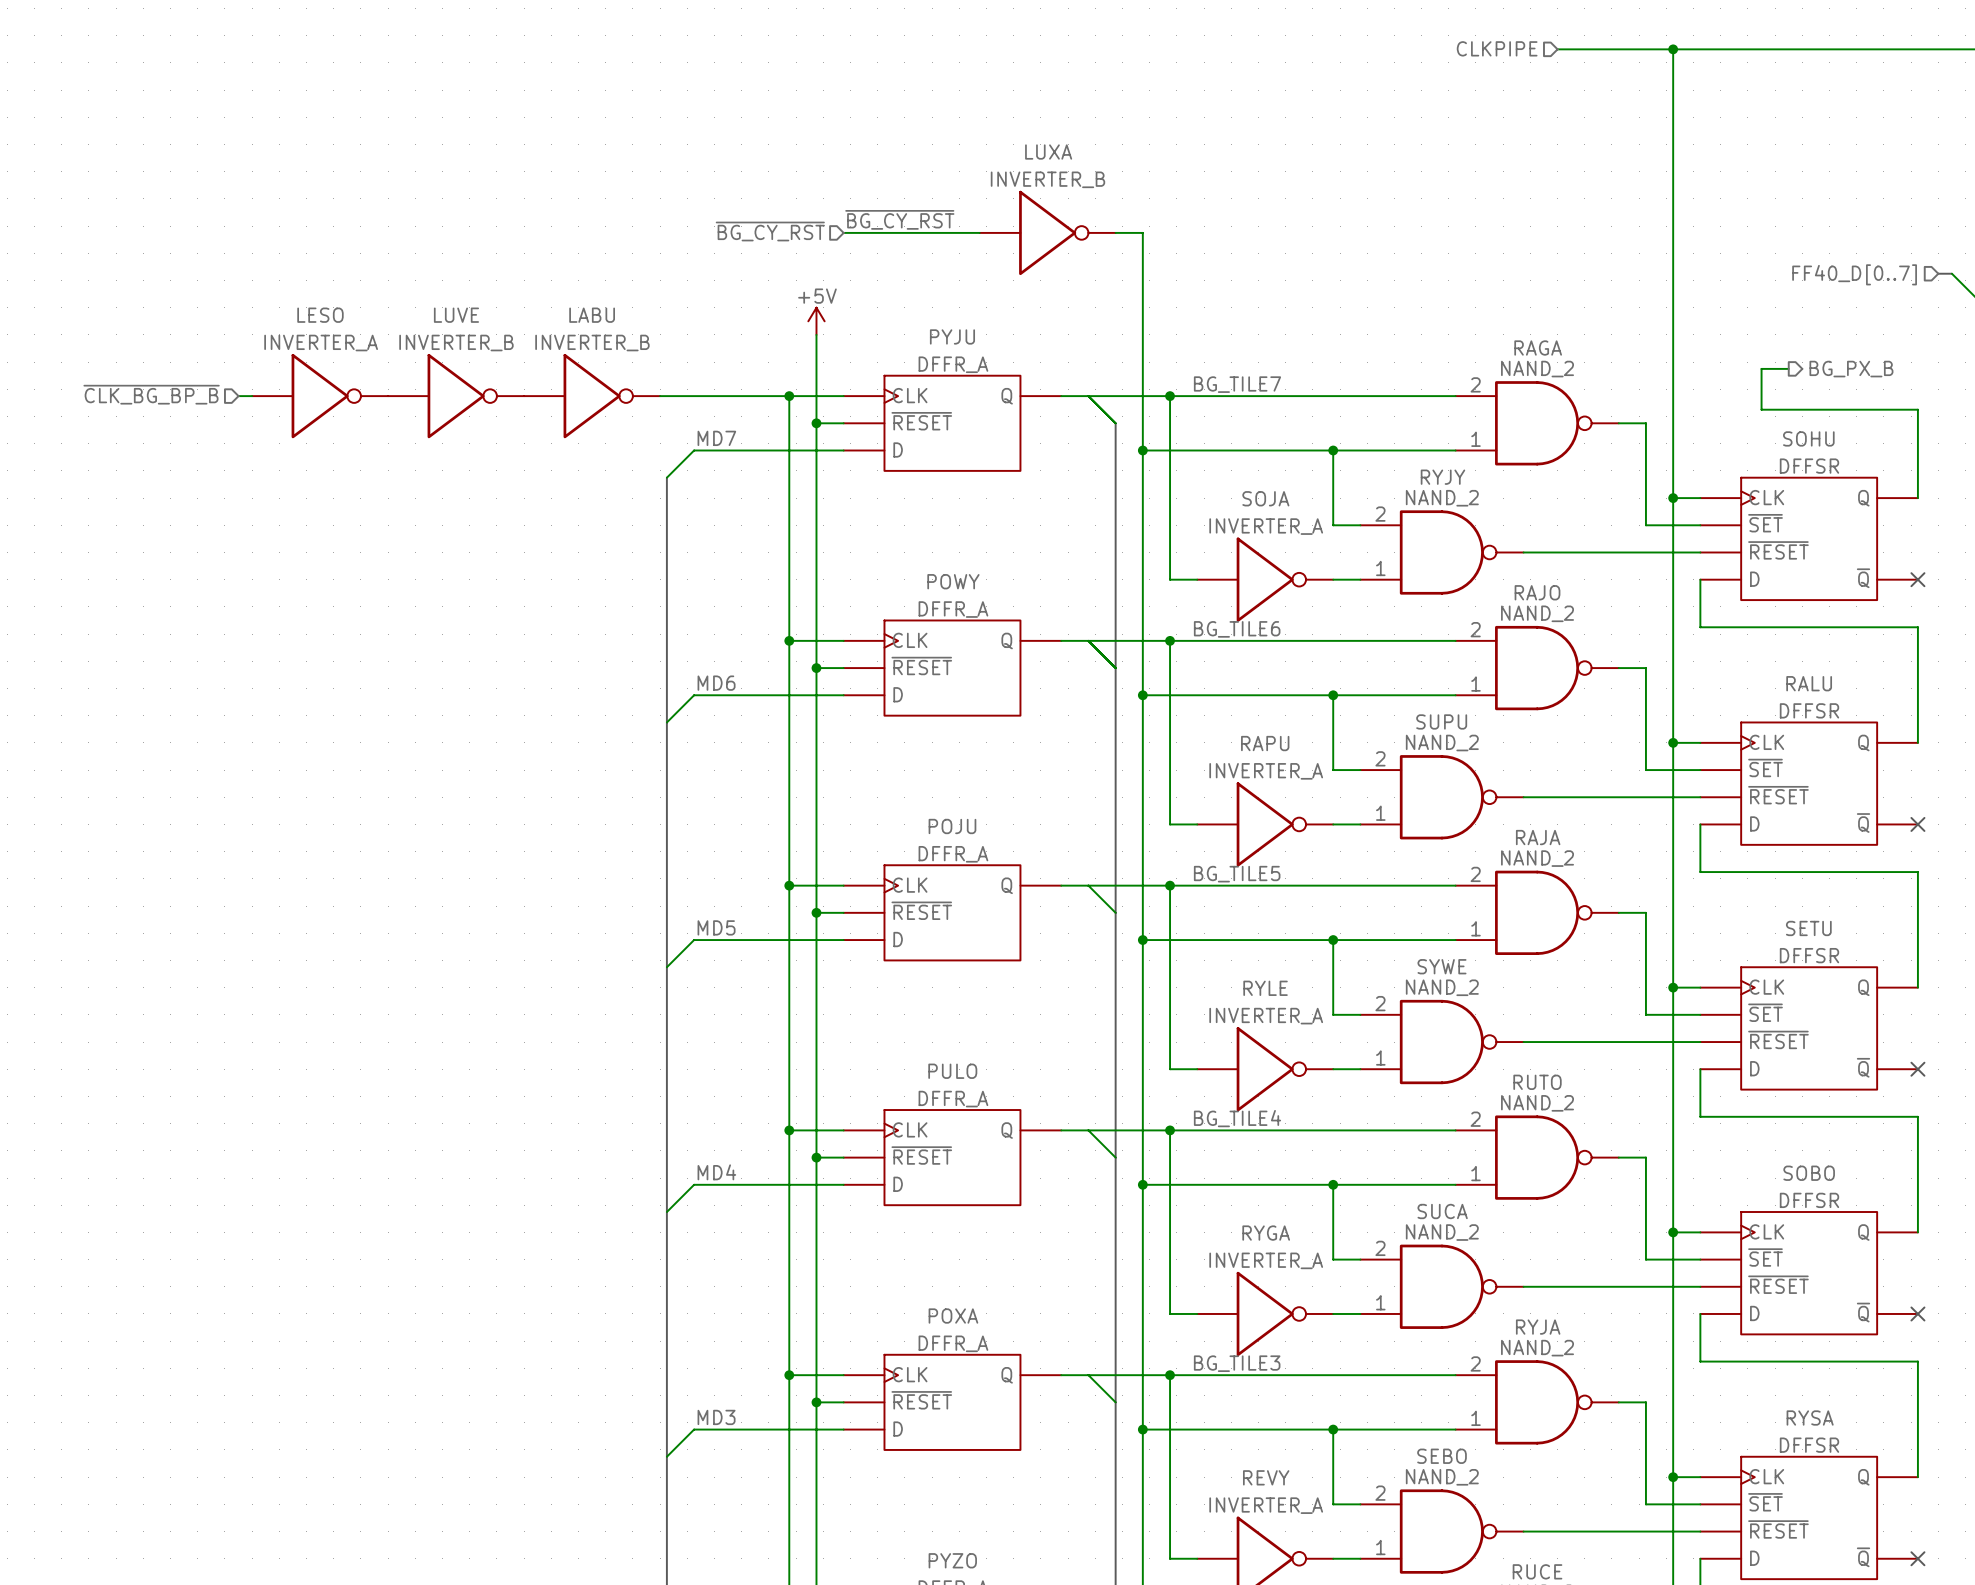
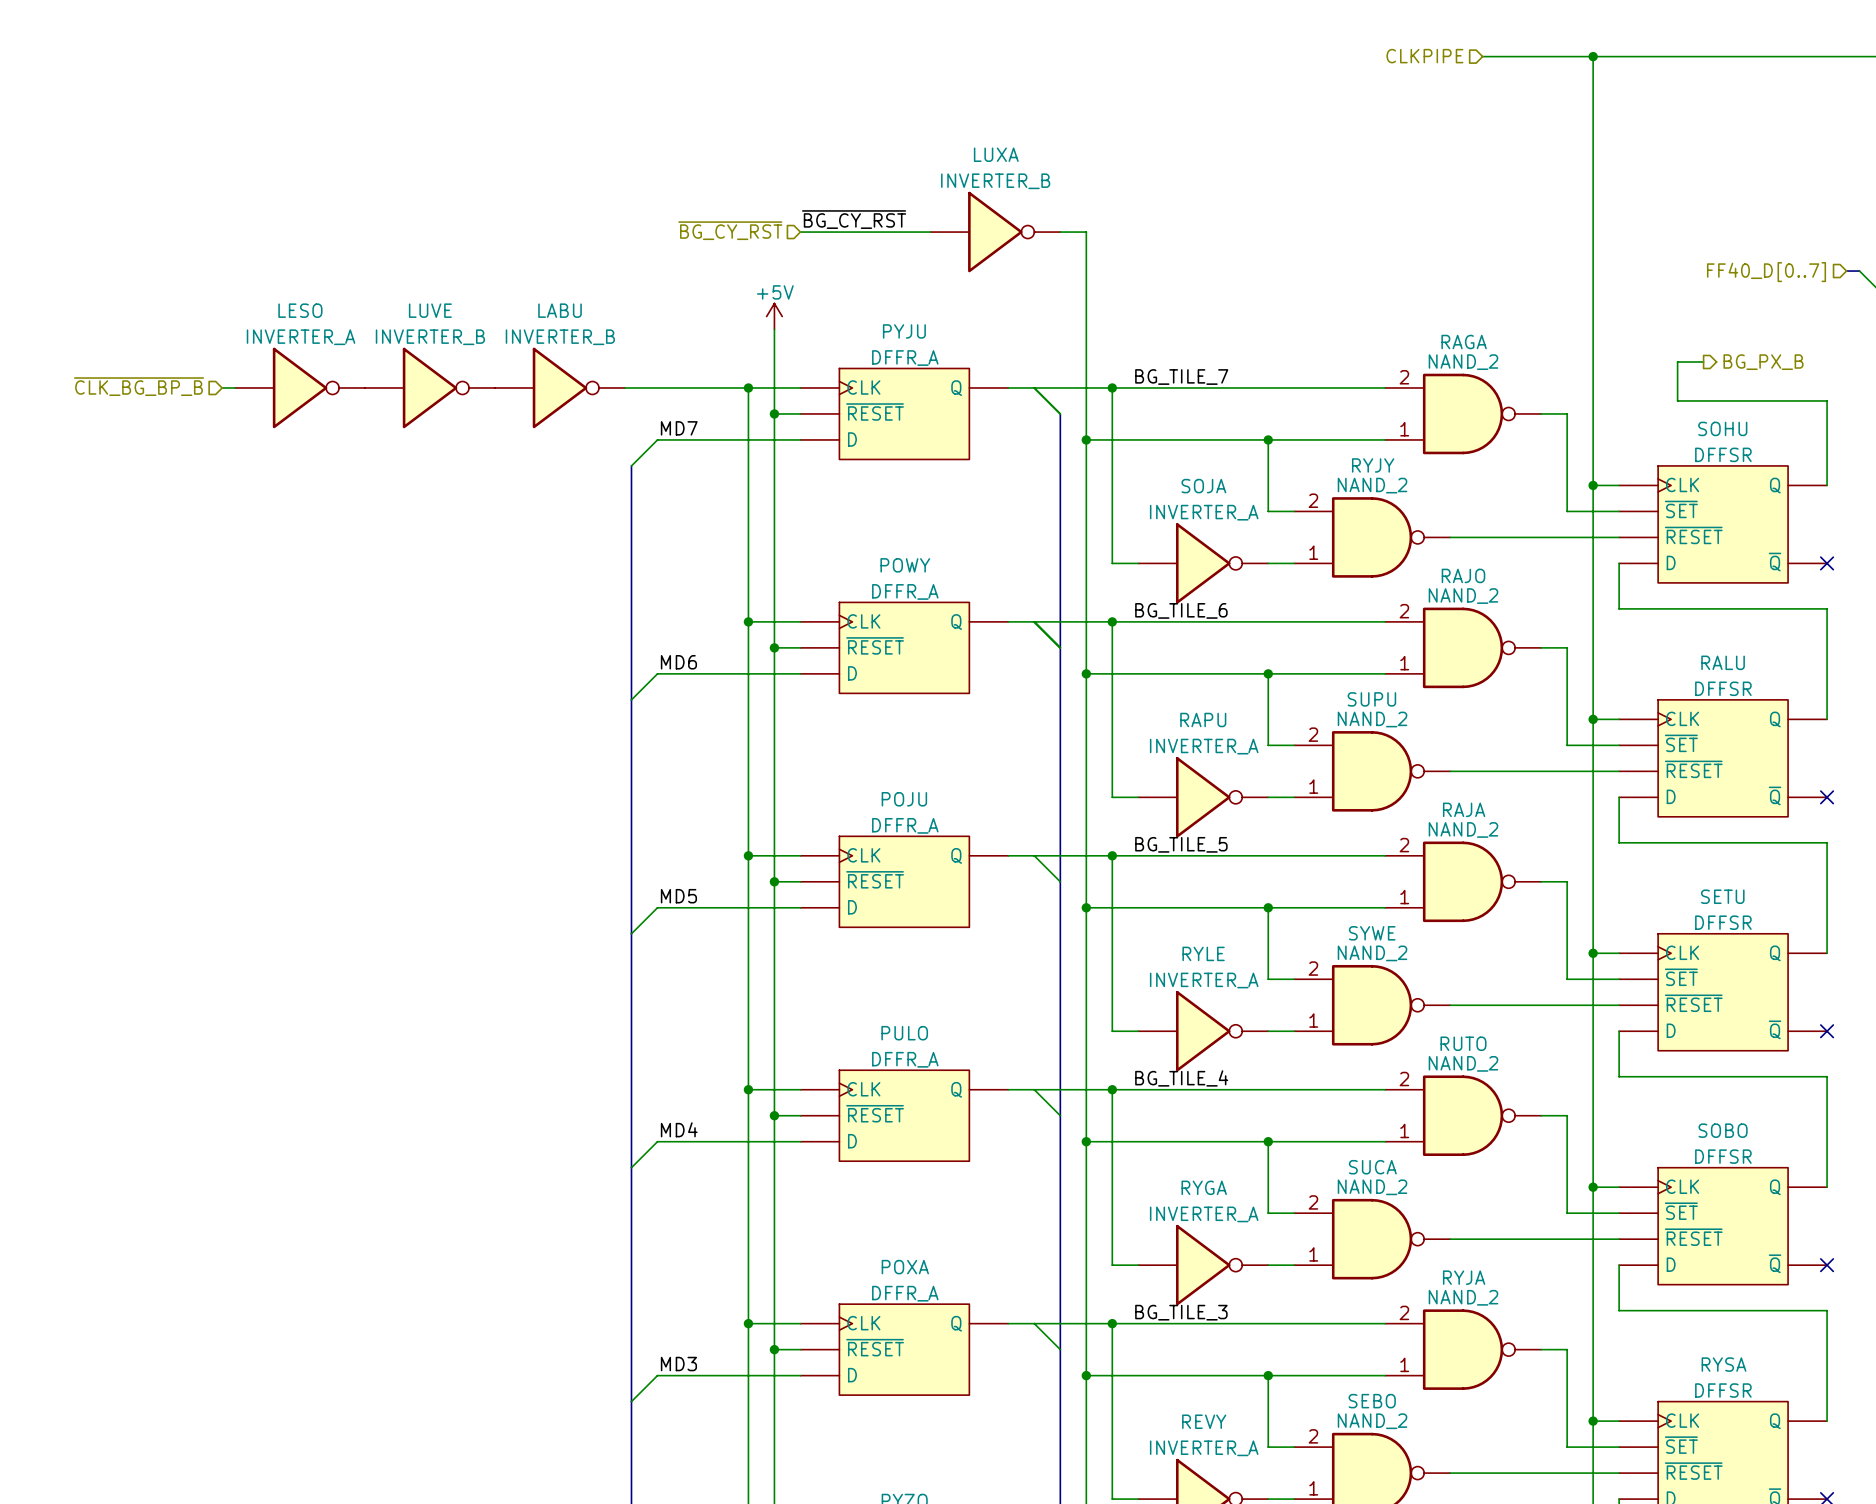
label: BG_TILE7 (1237, 384) -> BG_TILE_7 (1181, 377)
label: BG_TILE6 (1237, 629) -> BG_TILE_6 (1181, 610)
label: BG_TILE5 (1237, 874) -> BG_TILE_5 (1181, 844)
label: BG_TILE4 (1237, 1118) -> BG_TILE_4 (1181, 1078)
label: BG_TILE3 (1237, 1363) -> BG_TILE_3 (1181, 1312)

